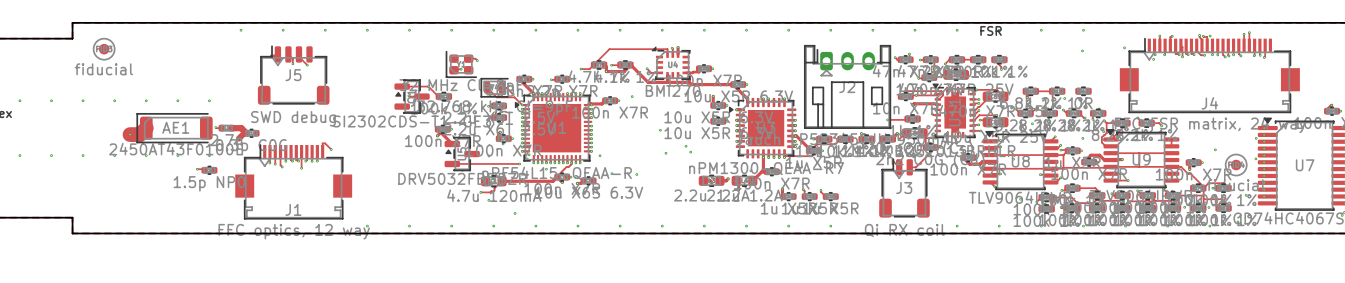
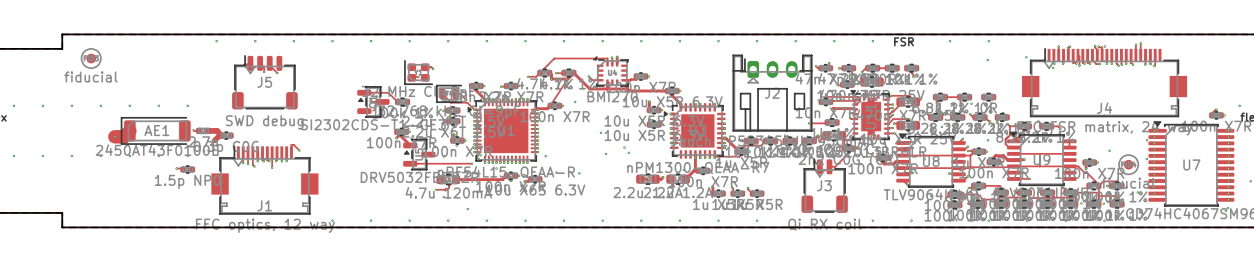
track: none -> (567, 79) (550, 105)
track: (571, 162) (556, 176) -> none

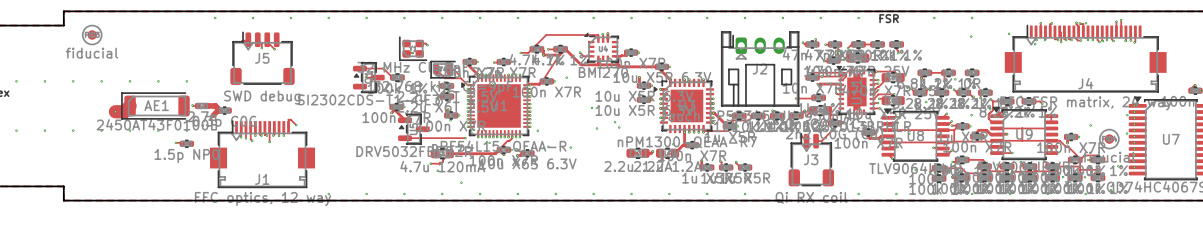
track: none -> (512, 137) (499, 149)

